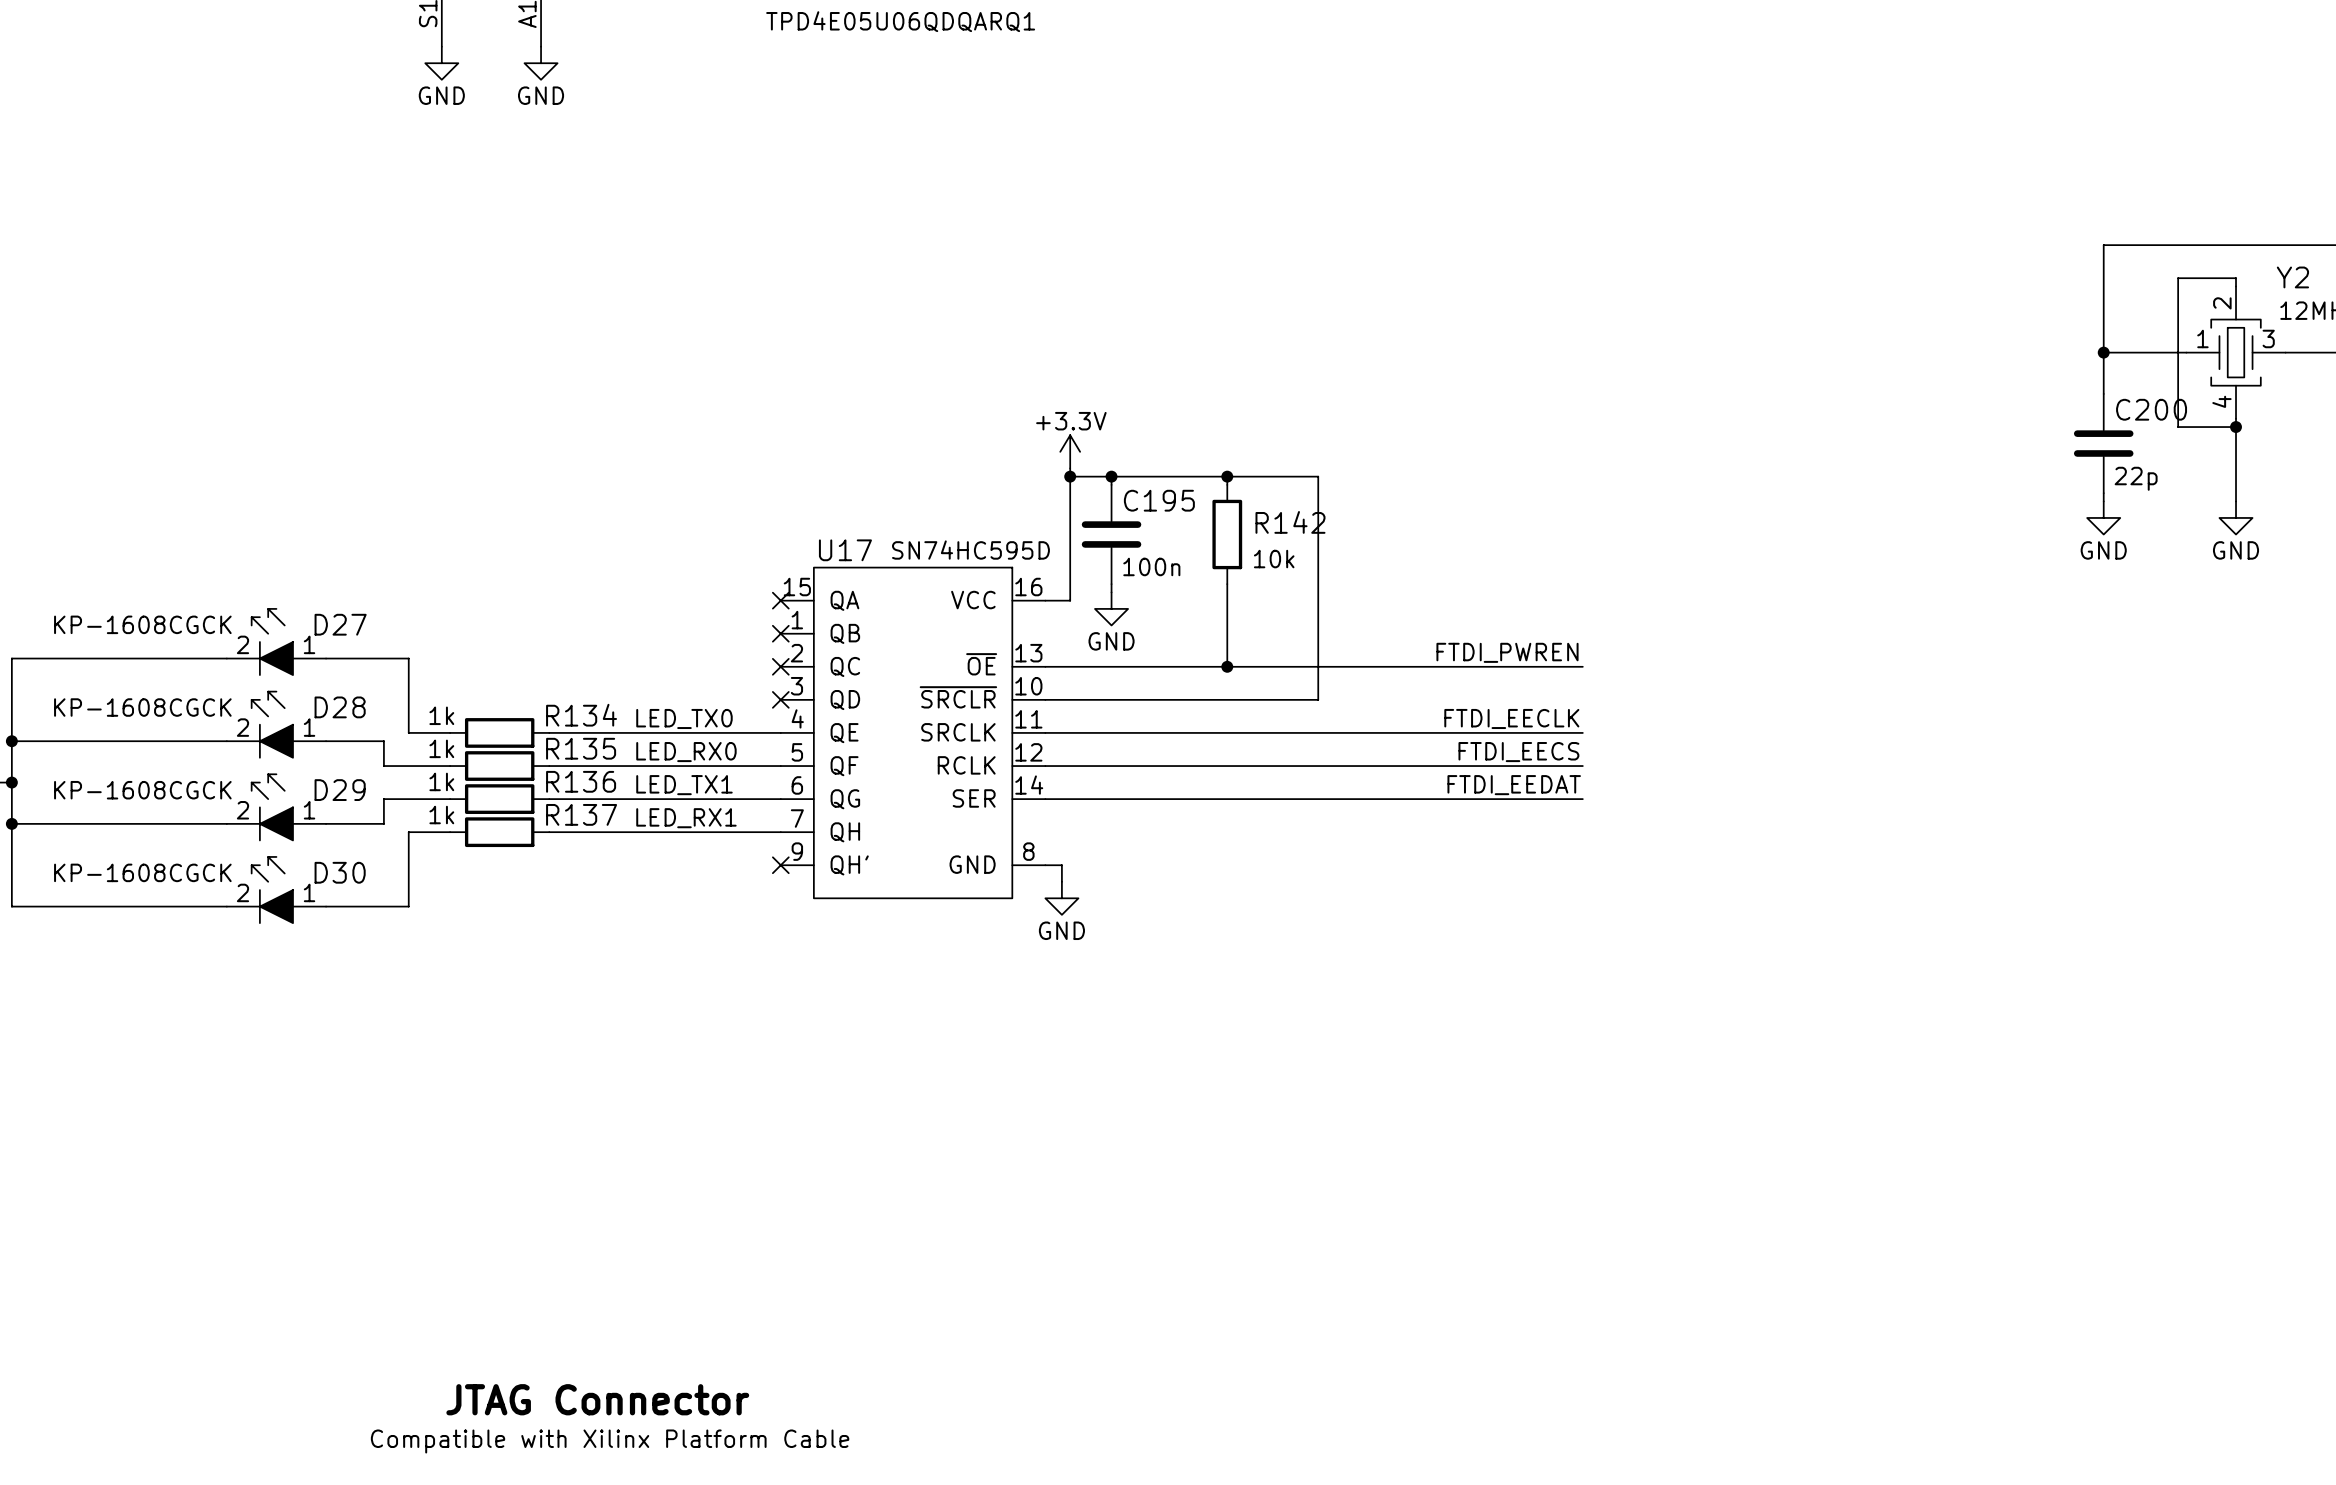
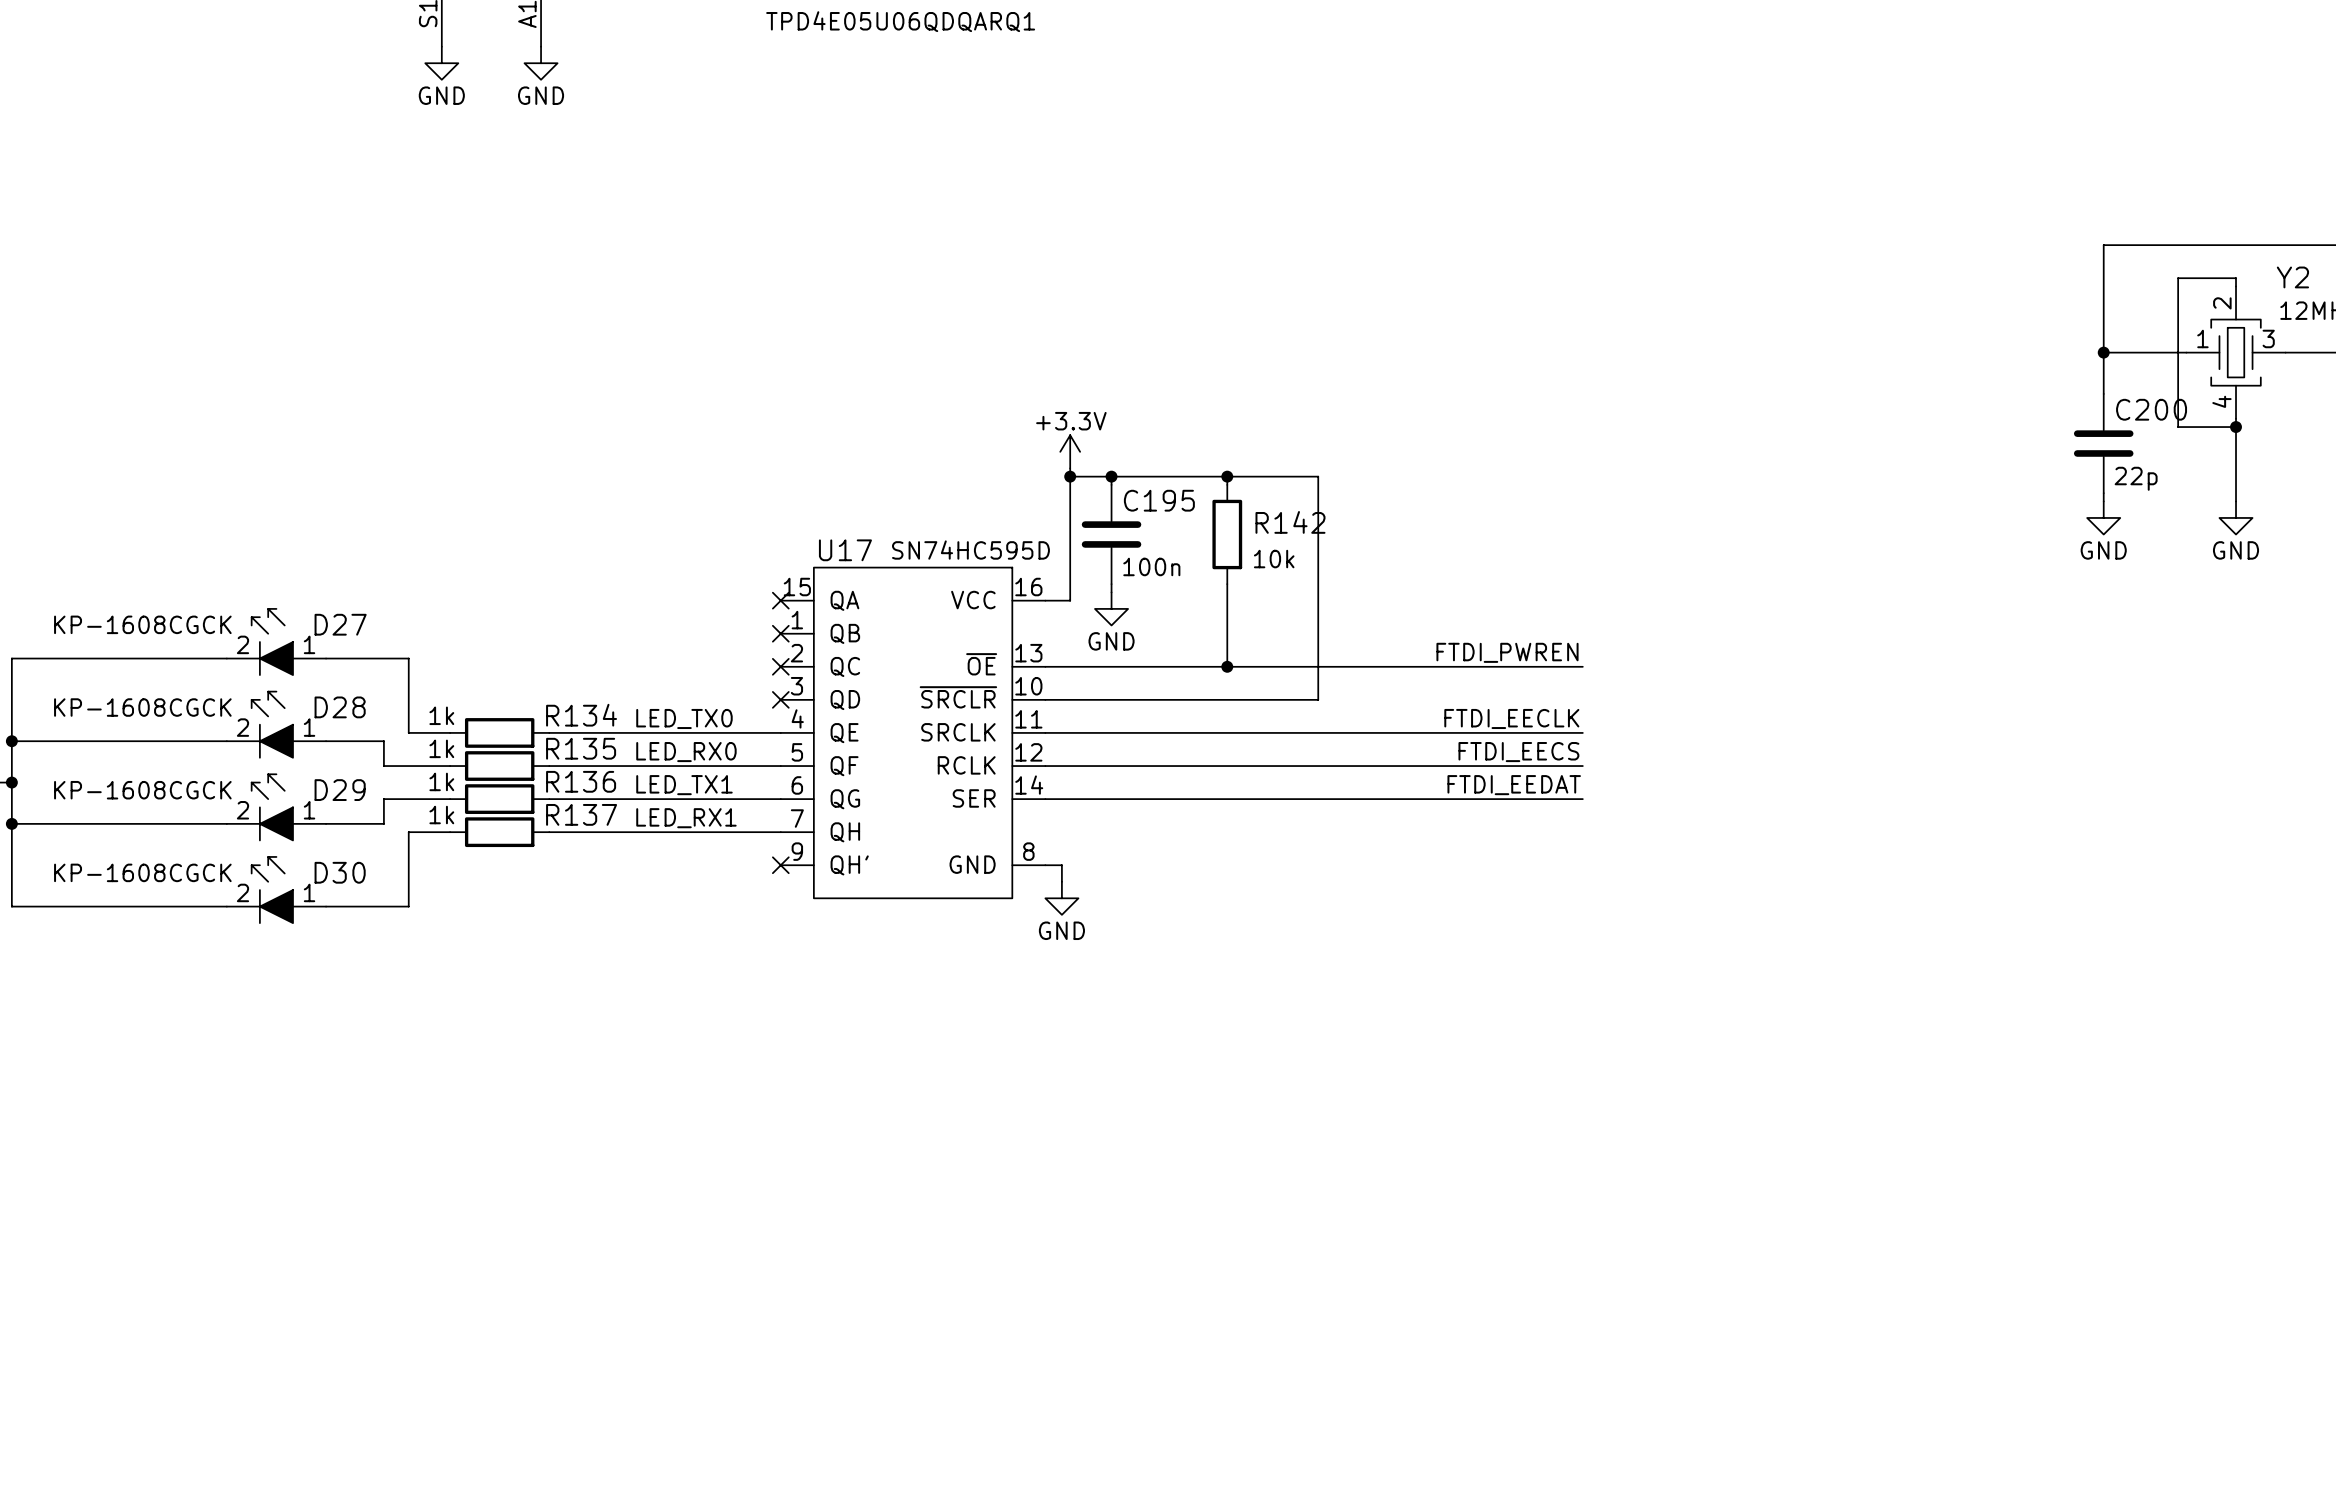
text: JTAG Connector (597, 1399) -> none
text: Compatible with Xilinx Platform Cable (610, 1441) -> none

